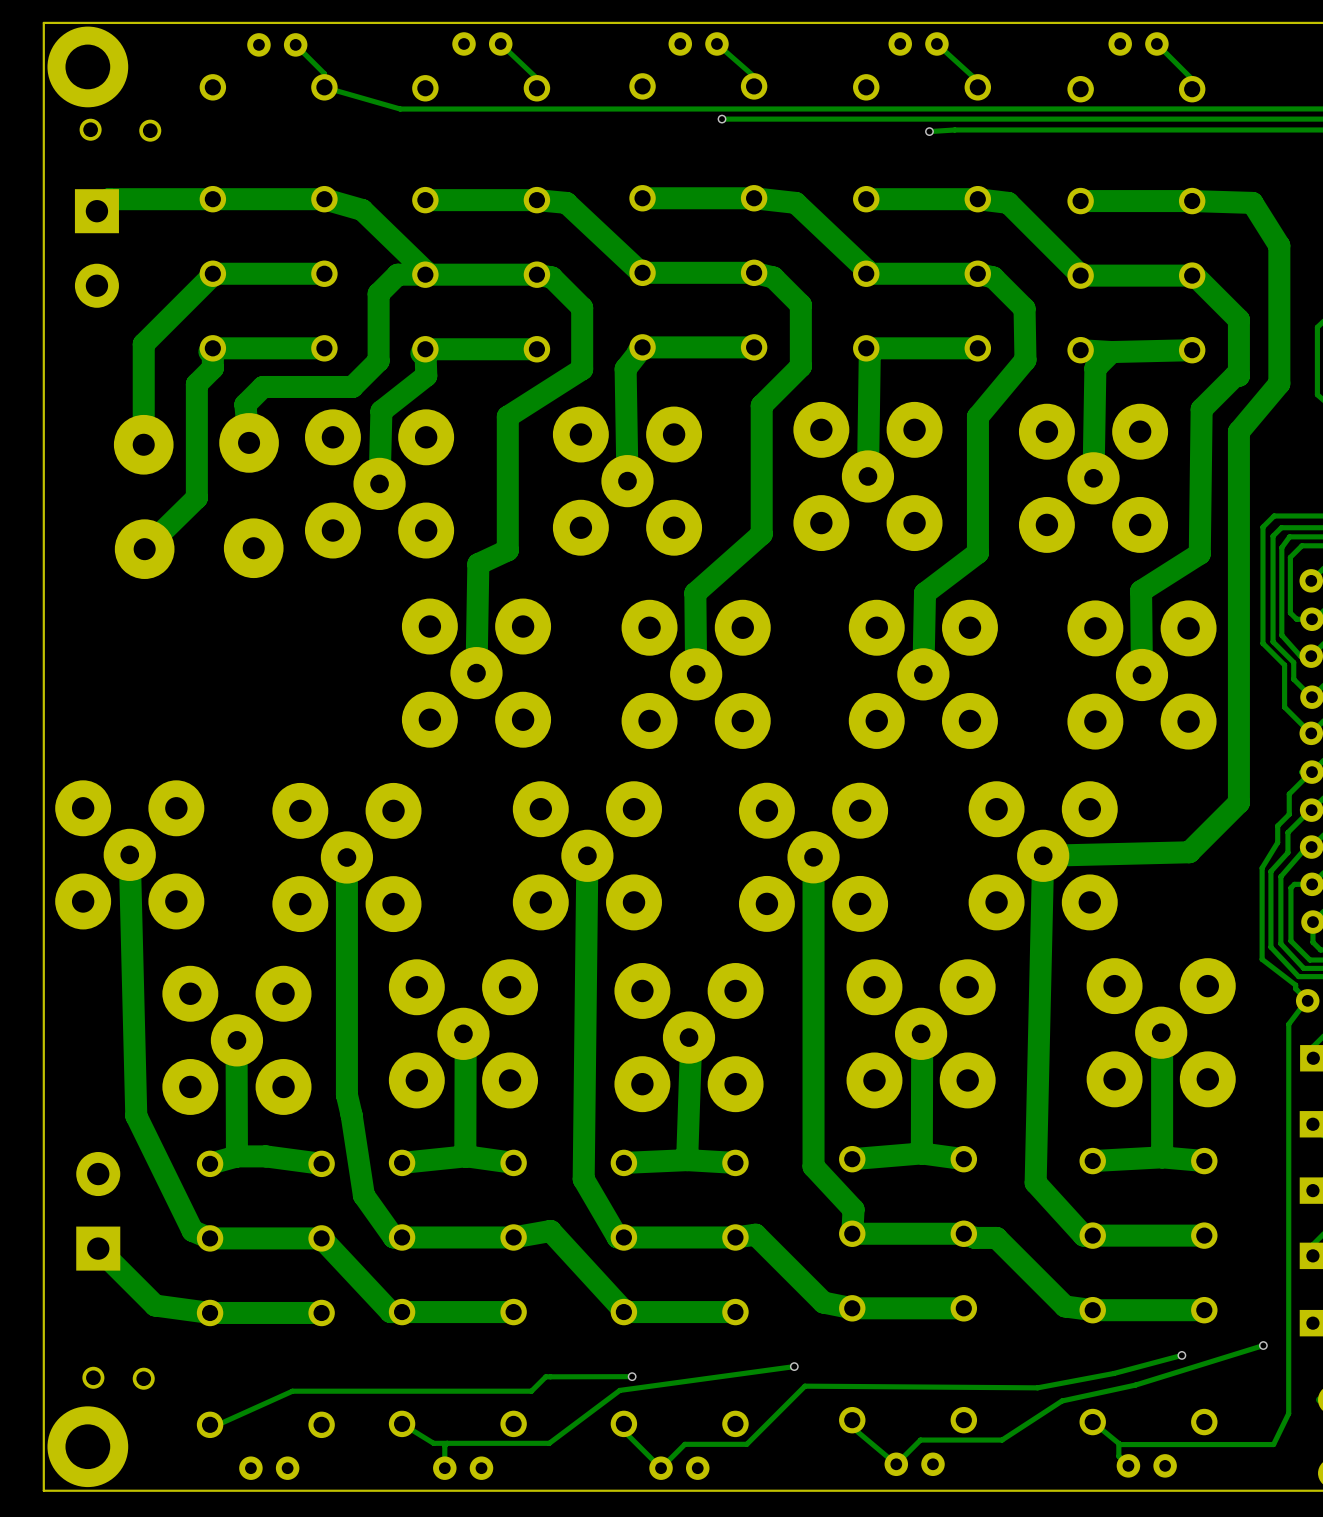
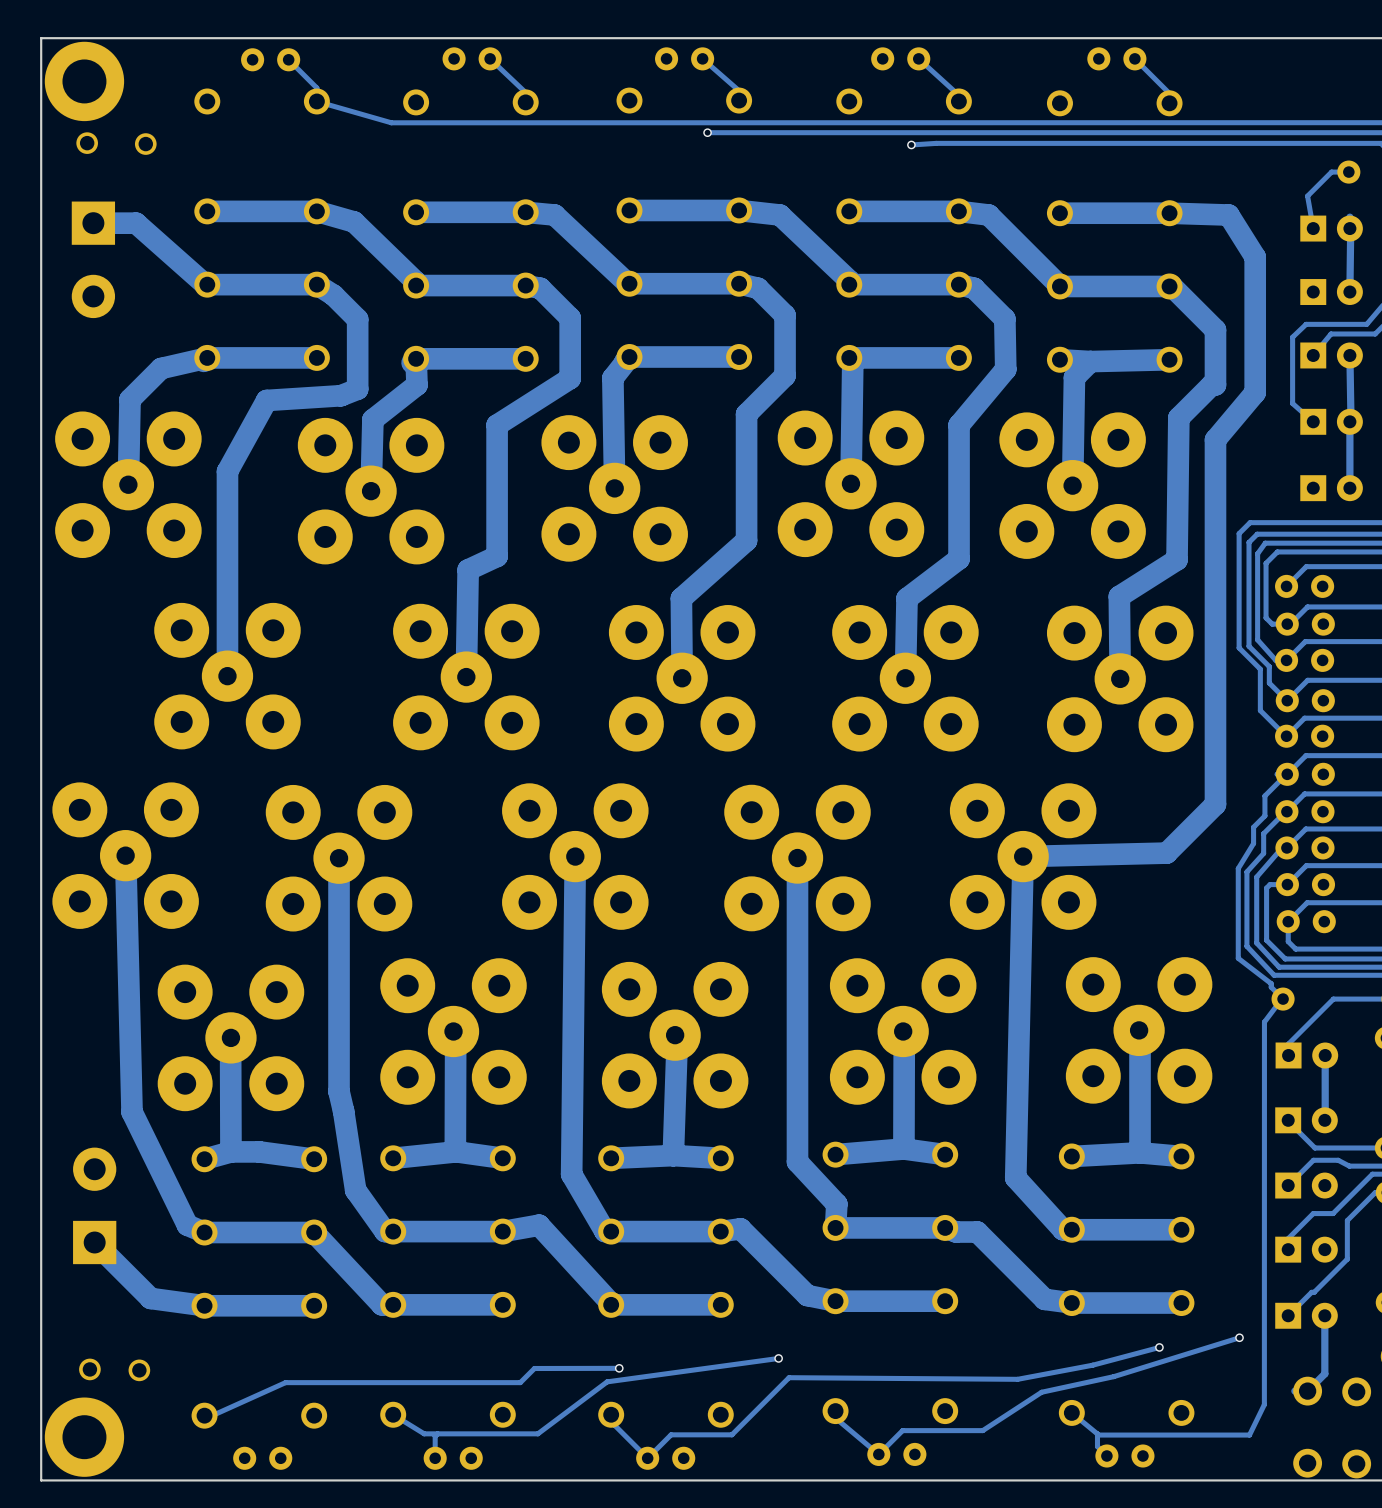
track: (212, 199) (108, 199) (96, 211) -> (205, 284) (136, 223) (93, 223)
track: (212, 273) (143, 344) (143, 444) -> none
track: none -> (316, 284) (333, 295) (357, 319) (357, 389) (341, 395) (266, 400) (227, 471) (227, 676)
track: (425, 274) (397, 274) (378, 293) (378, 360) (352, 386) (263, 386) (245, 404) (249, 442) -> none
track: (212, 348) (212, 368) (196, 384) (196, 497) (144, 549) -> (207, 357) (161, 368) (130, 399) (128, 484)
part: (249, 442) -> none
part: (143, 444) -> none
part: none -> (128, 484)
part: (253, 548) -> none
part: (144, 549) -> none
part: none -> (227, 676)

